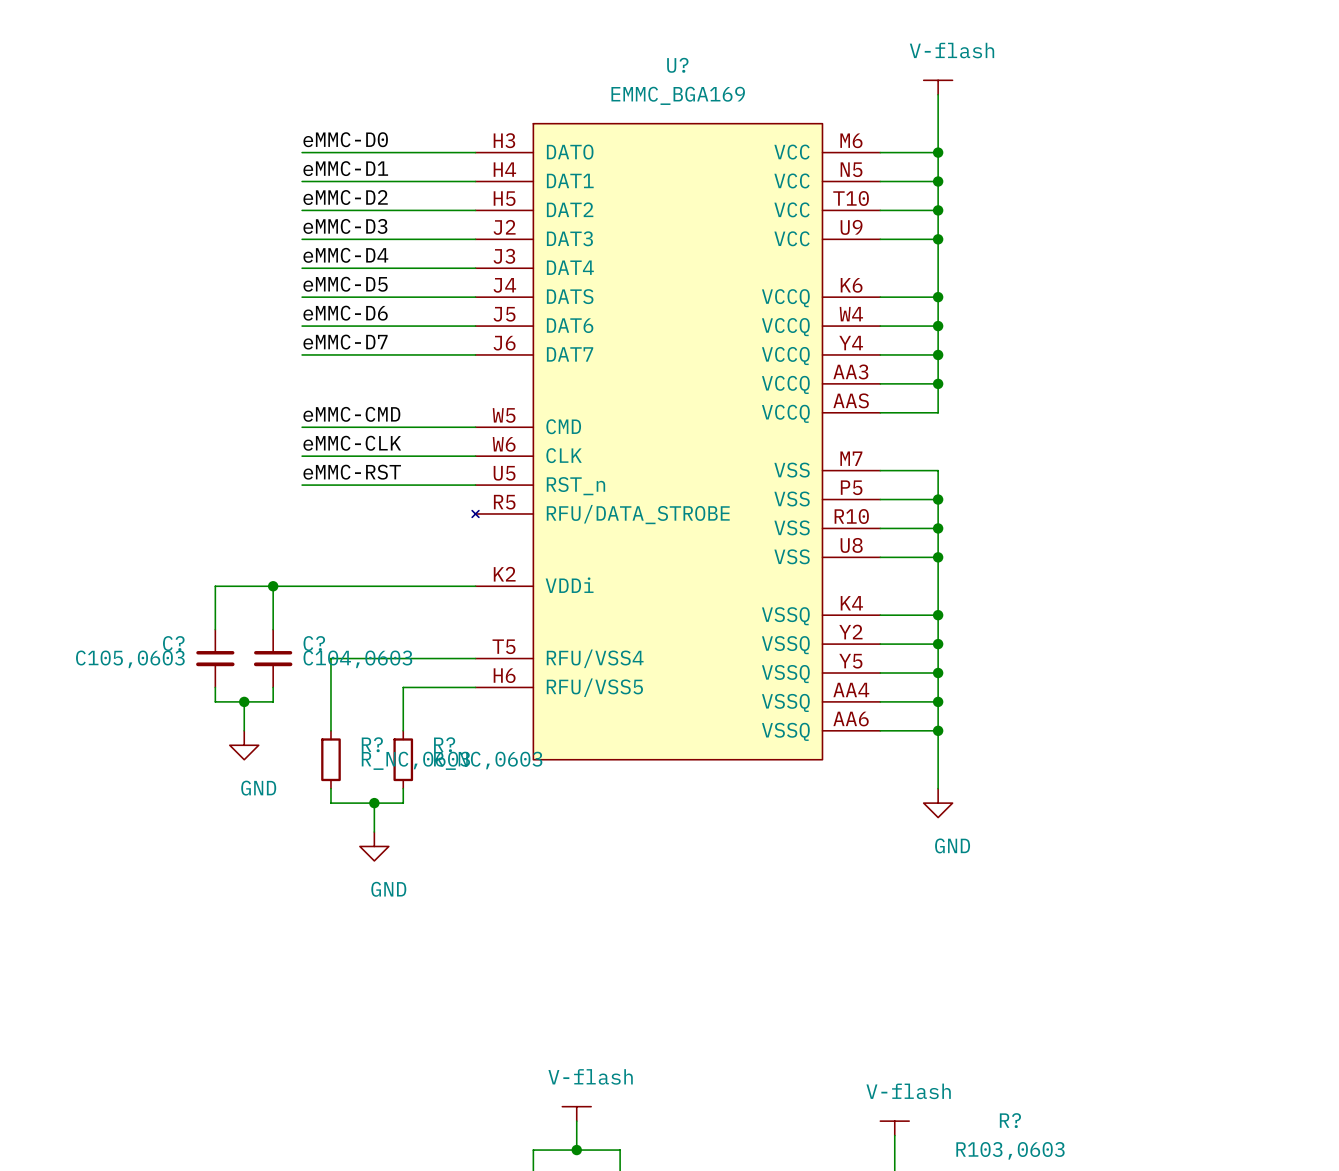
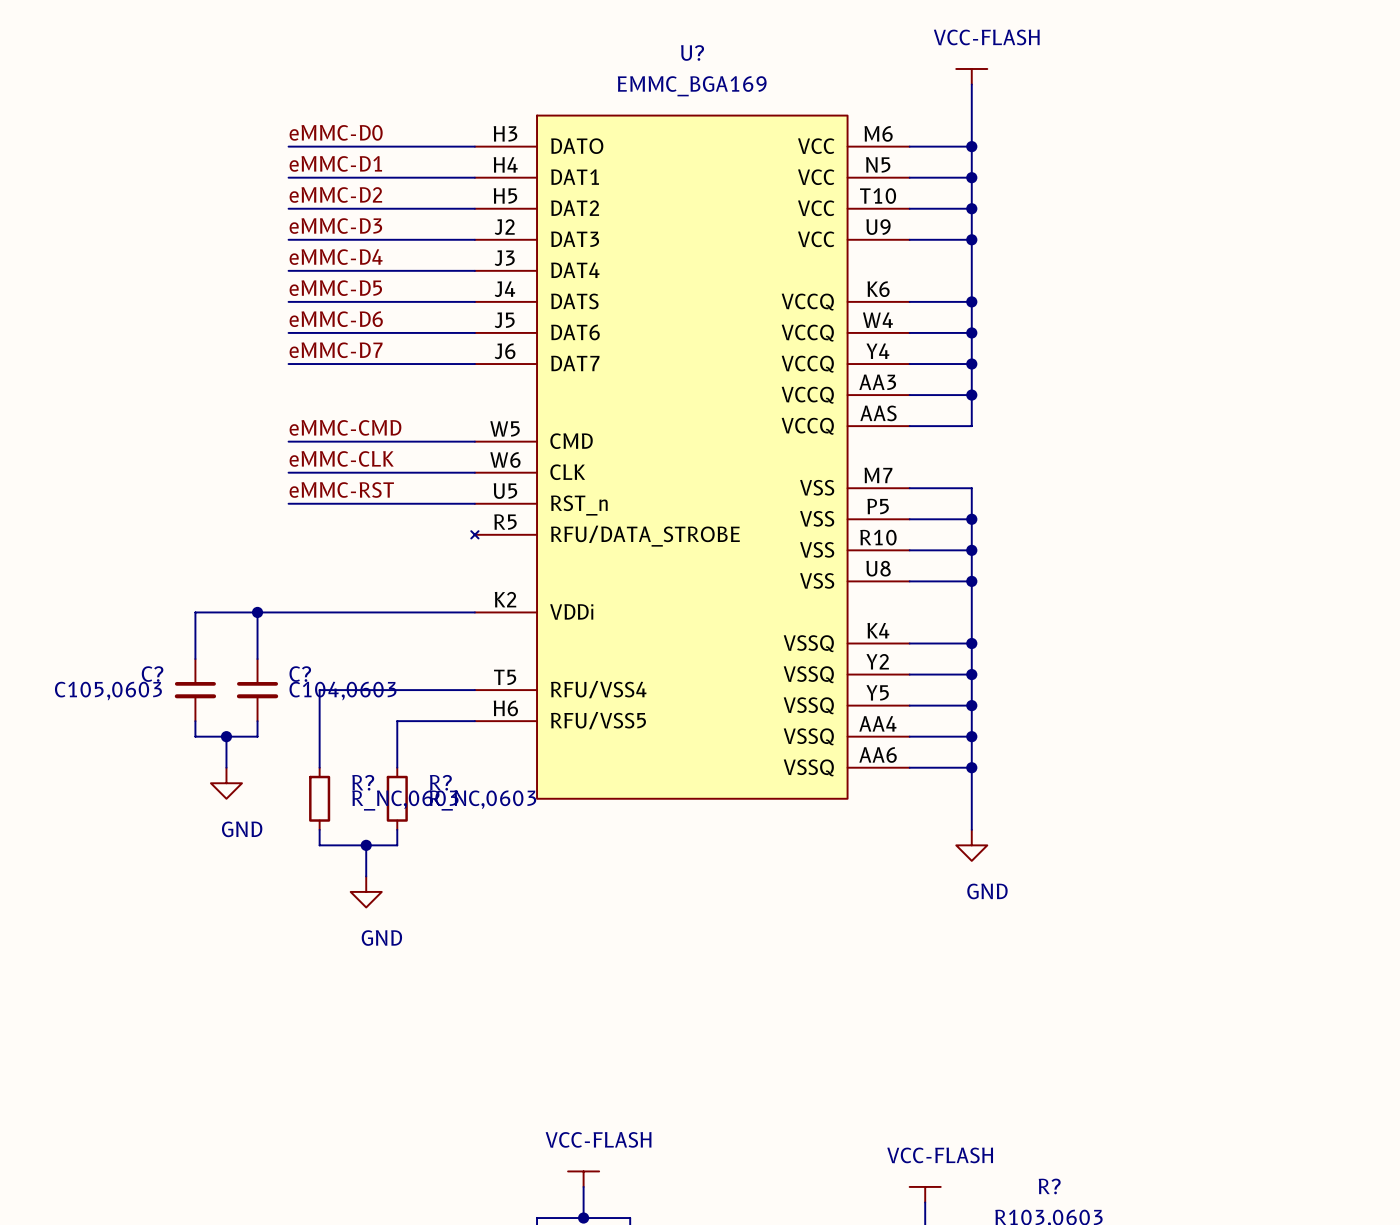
power symbol: V-flash (938, 87) -> VCC-FLASH (971, 76)
power symbol: V-flash (576, 1113) -> VCC-FLASH (583, 1179)
power symbol: V-flash (894, 1128) -> VCC-FLASH (925, 1194)

